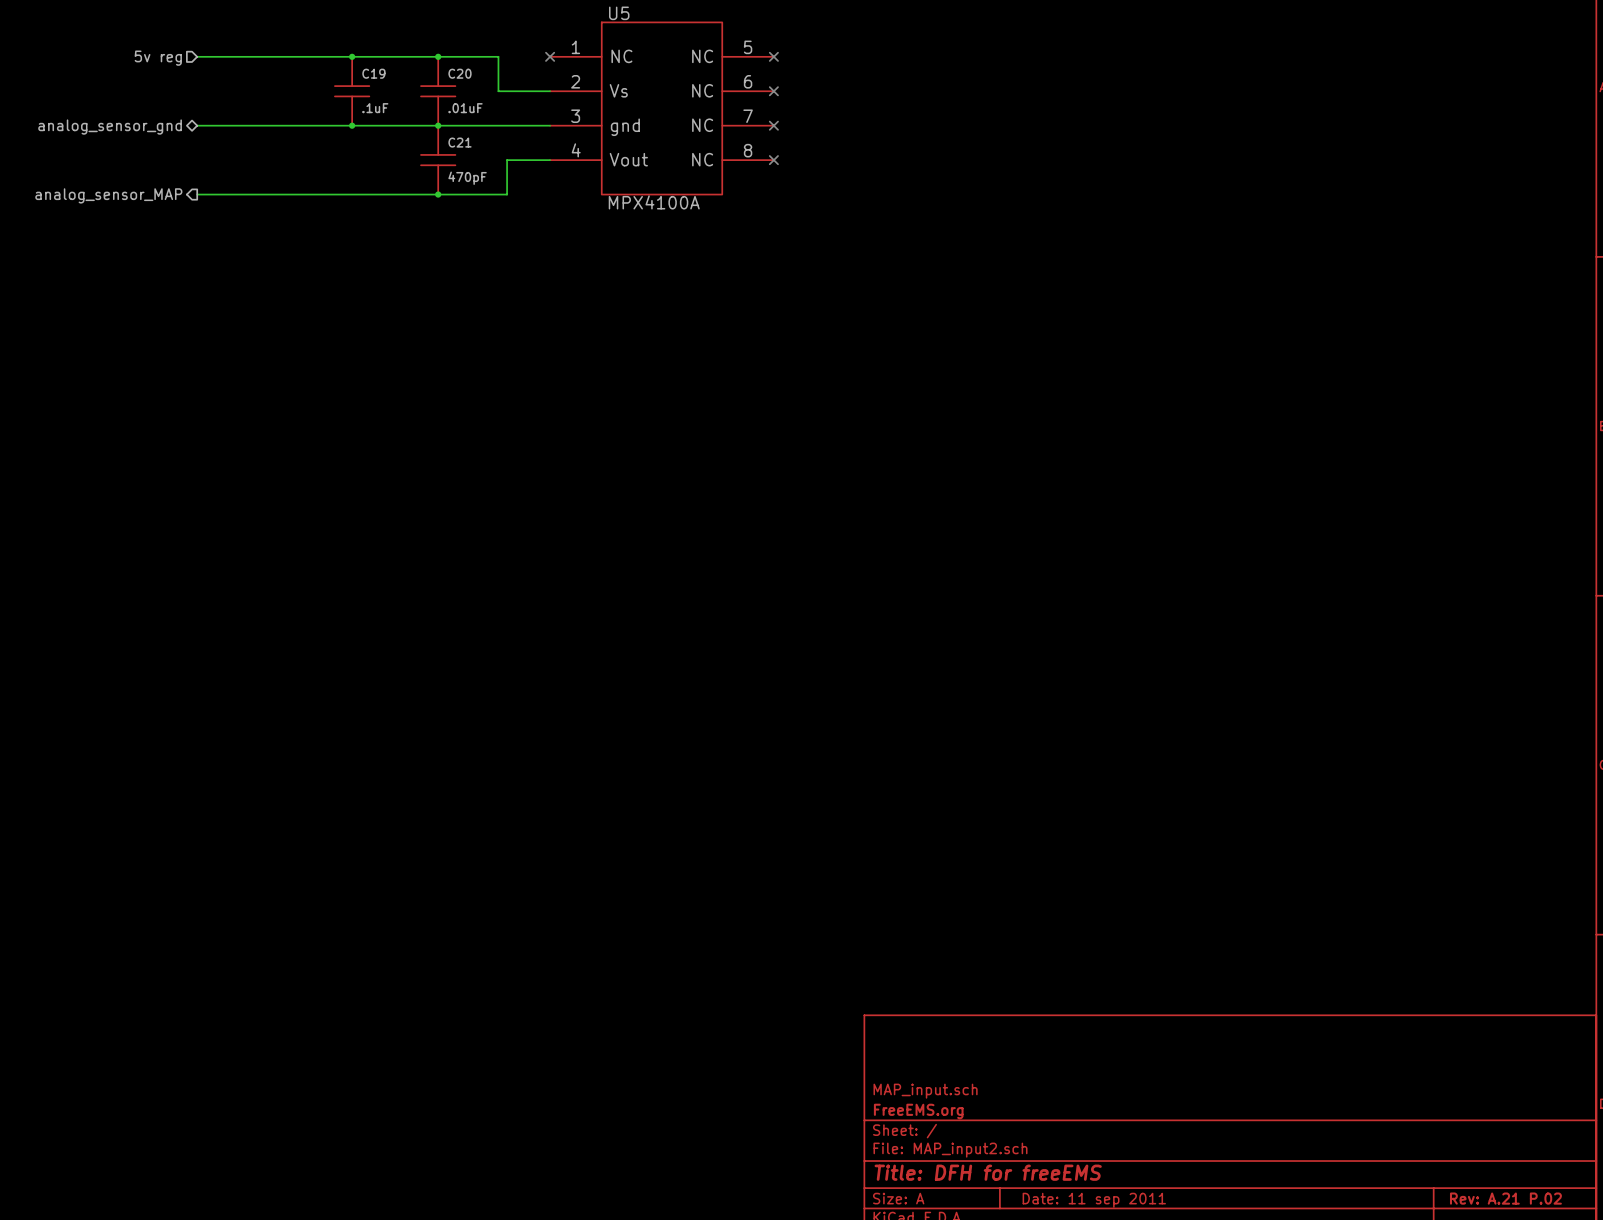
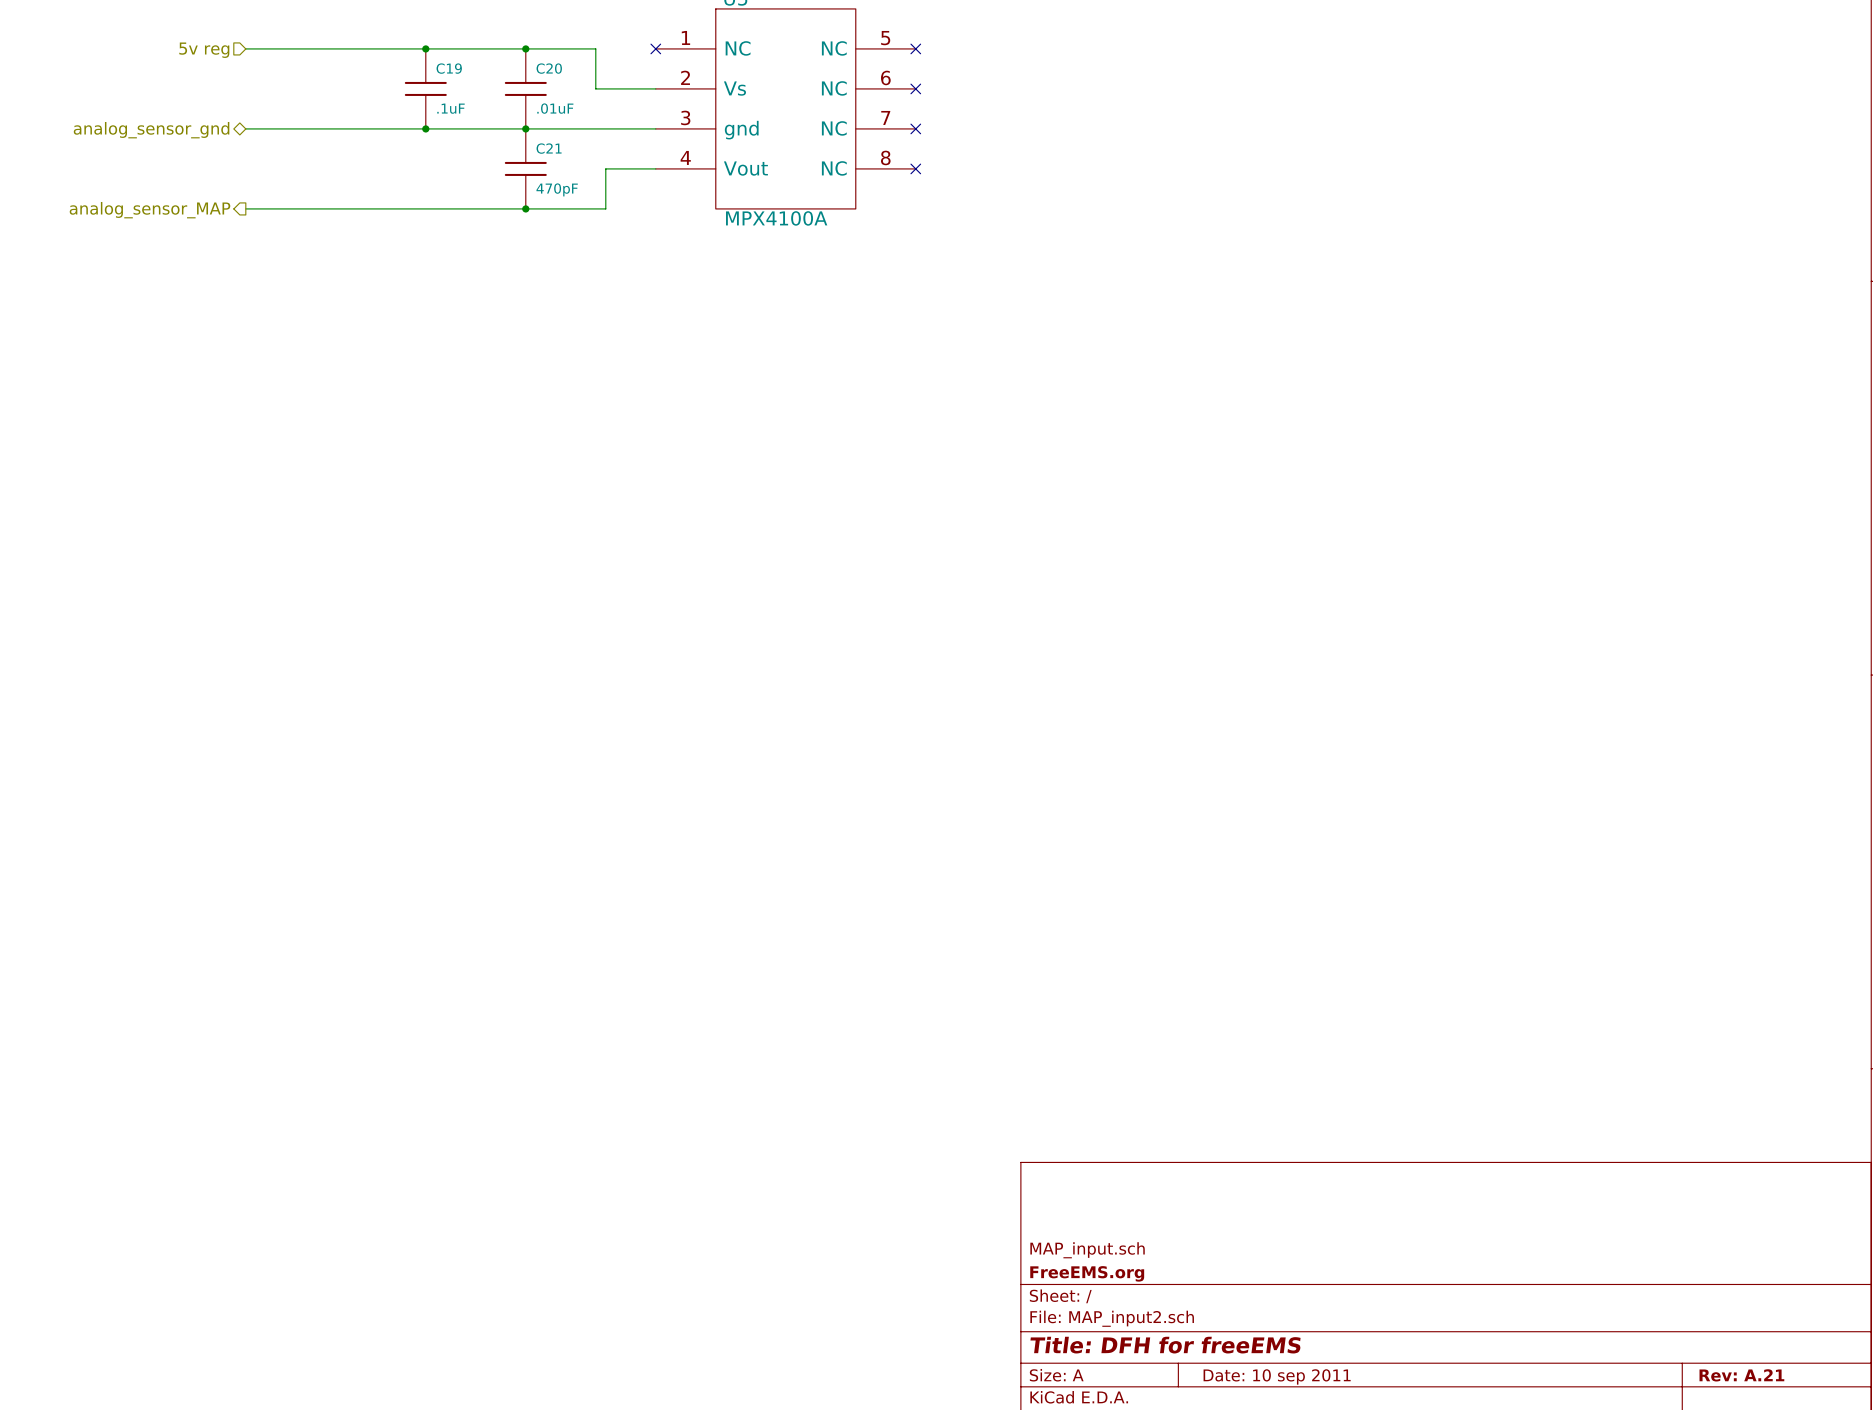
title block: Rev: A.21 P.02 (1505, 1198) -> Rev: A.21 (1741, 1375)
title block: Date: 11 sep 2011 (1094, 1200) -> Date: 10 sep 2011 (1277, 1376)

